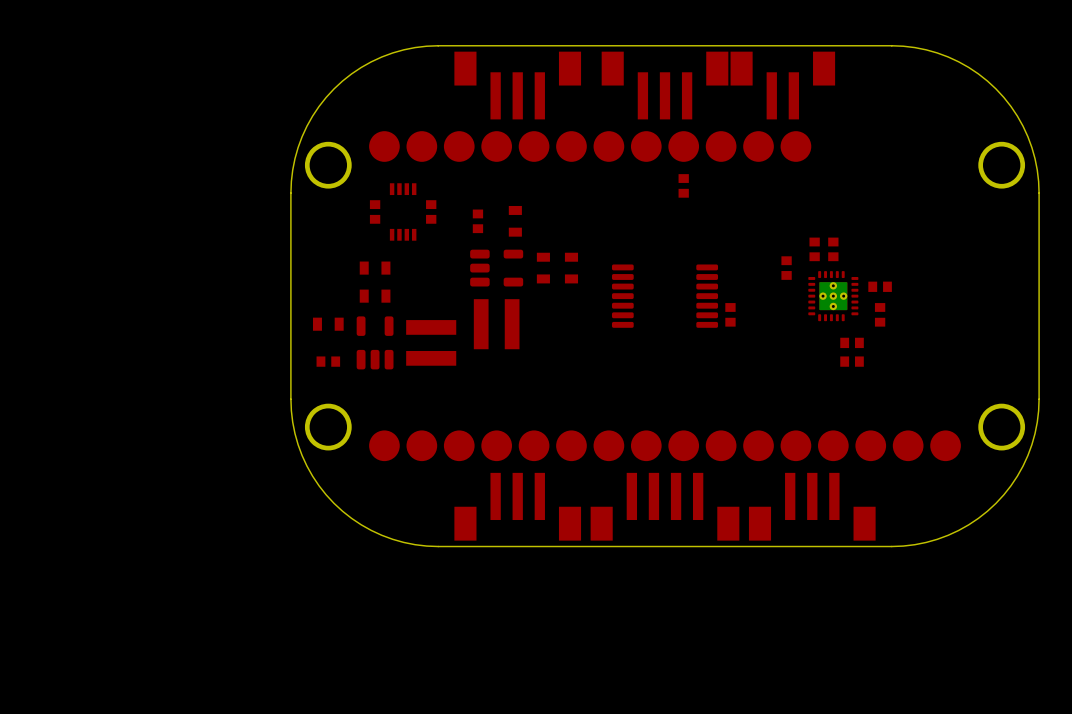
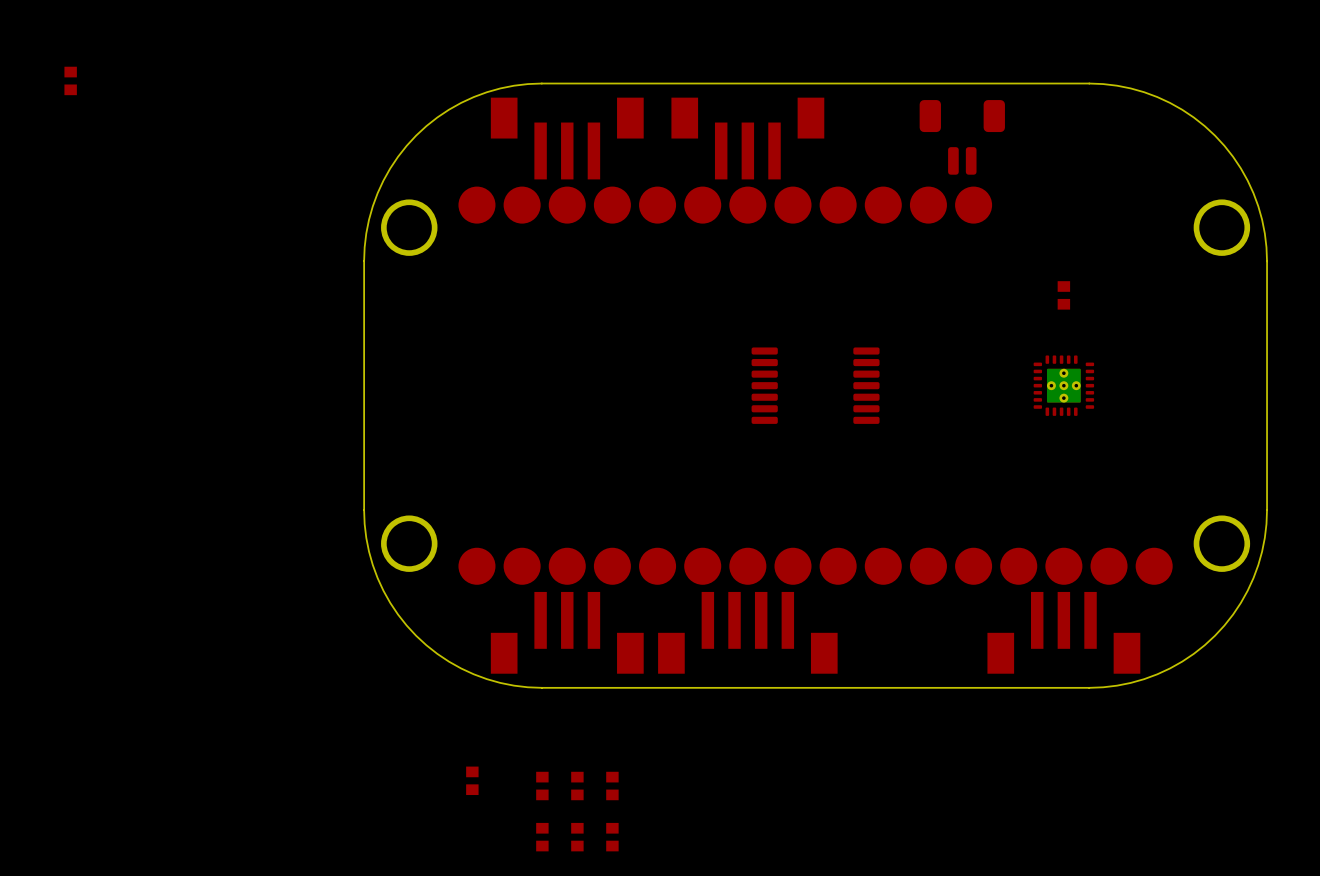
part: none -> (70, 80)
part footprint: [730, 51, 836, 120] -> [919, 100, 1005, 175]
part: (517, 85) -> none
part: (665, 85) -> none
part: none -> (567, 138)
part: none -> (747, 138)
part: (683, 185) -> none
part: (375, 211) -> none
part: (403, 211) -> none
part: (431, 211) -> none
part: (477, 221) -> none
part: (515, 221) -> none
part: none -> (1063, 295)
part: (814, 249) -> none
part: (833, 249) -> none
part: (375, 268) -> none
part: (496, 268) -> none
part: (543, 268) -> none
part: (571, 268) -> none
part: (786, 268) -> none
part: (880, 286) -> none
part: (375, 296) -> none
part position: (833, 296) -> (1063, 385)
part: (730, 314) -> none
part: (880, 314) -> none
part: (328, 324) -> none
part: (496, 324) -> none
part: (375, 342) -> none
part: (431, 342) -> none
part: (852, 342) -> none
part: (328, 361) -> none
part: (852, 361) -> none
part position: (517, 506) -> (567, 632)
part position: (665, 506) -> (747, 632)
part position: (812, 506) -> (1063, 632)
part: none -> (472, 780)
part: none -> (542, 786)
part: none -> (577, 786)
part: none -> (612, 786)
part: none -> (542, 837)
part: none -> (577, 837)
part: none -> (612, 837)

